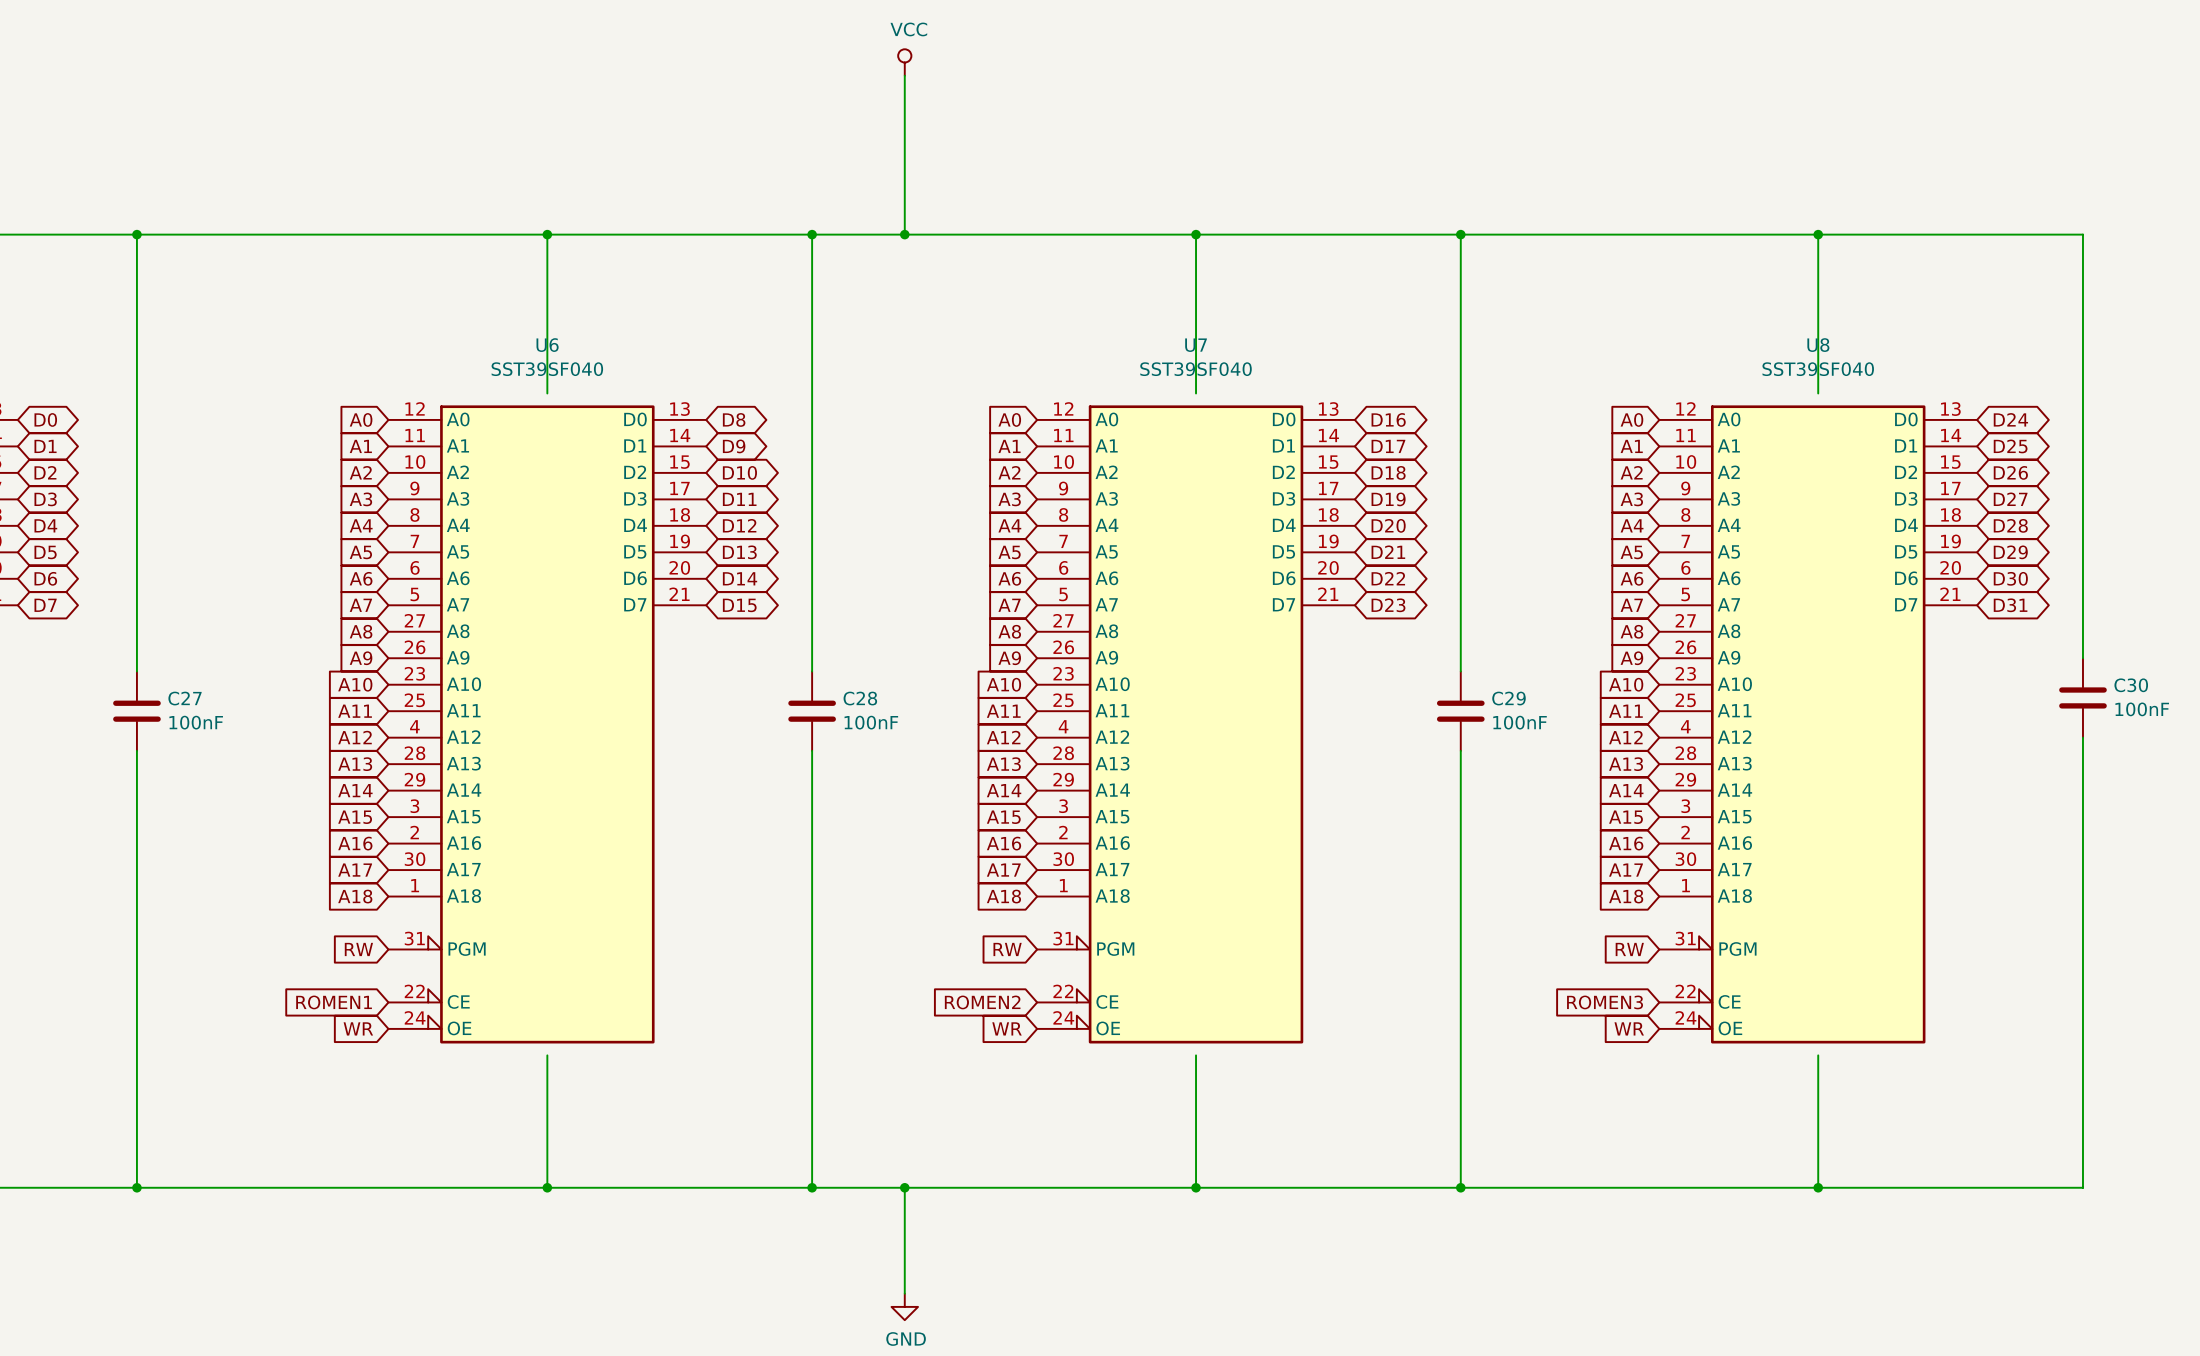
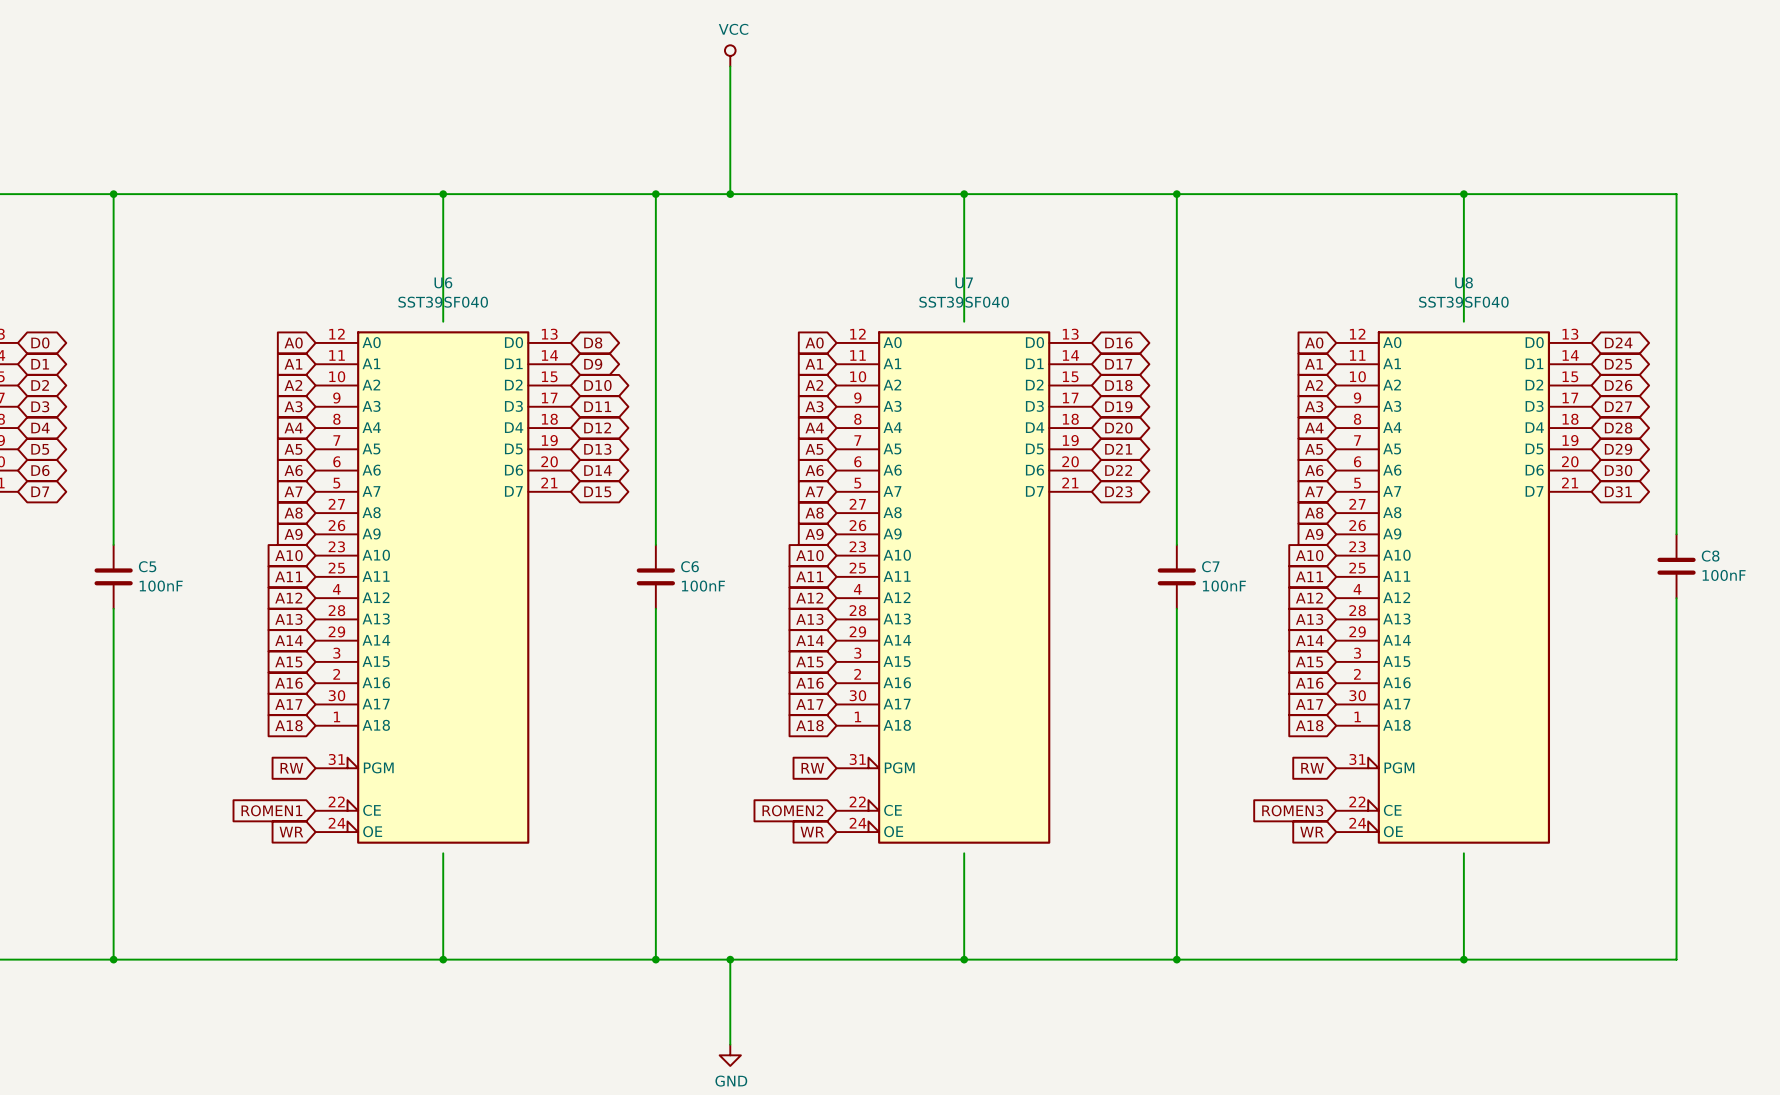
C30 name: C30 (2131, 685) -> C8 (1710, 556)
C27 name: C27 (185, 698) -> C5 (147, 566)
C28 name: C28 (860, 698) -> C6 (689, 566)
C29 name: C29 (1509, 698) -> C7 (1210, 566)

